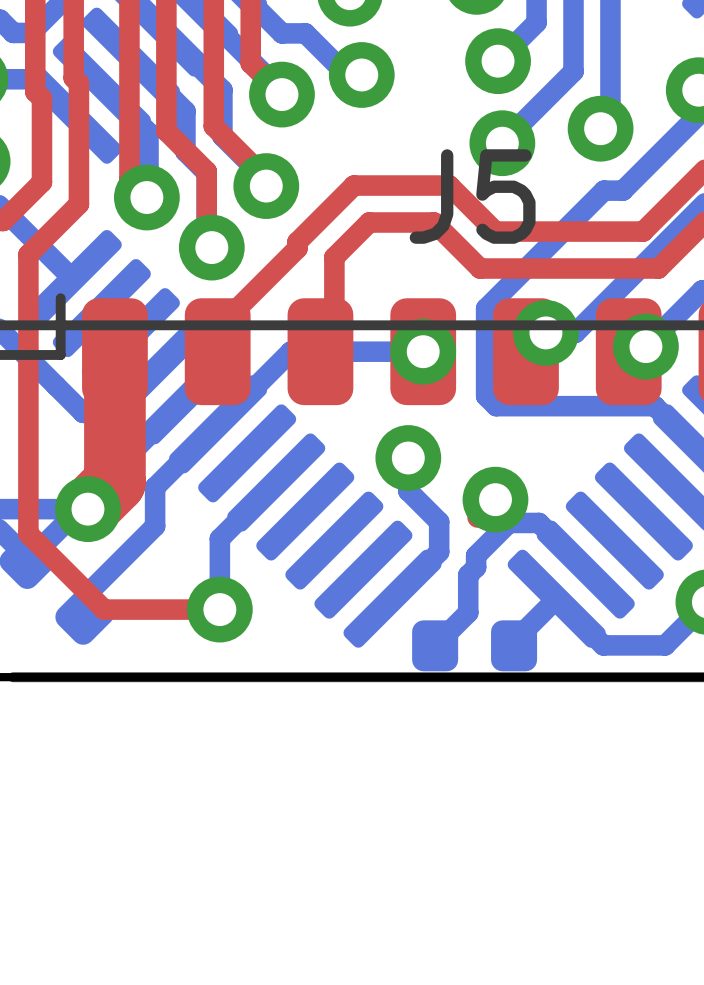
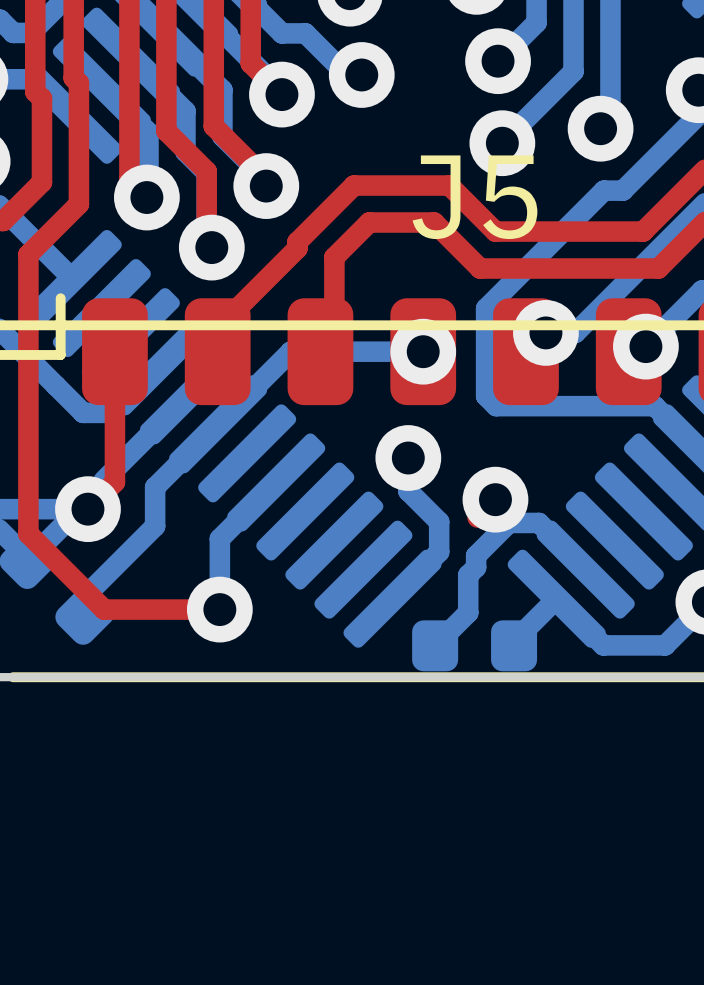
top track width: thick (114, 351) (114, 482) (87, 509) -> thin (114, 351) (114, 482) (87, 509)

